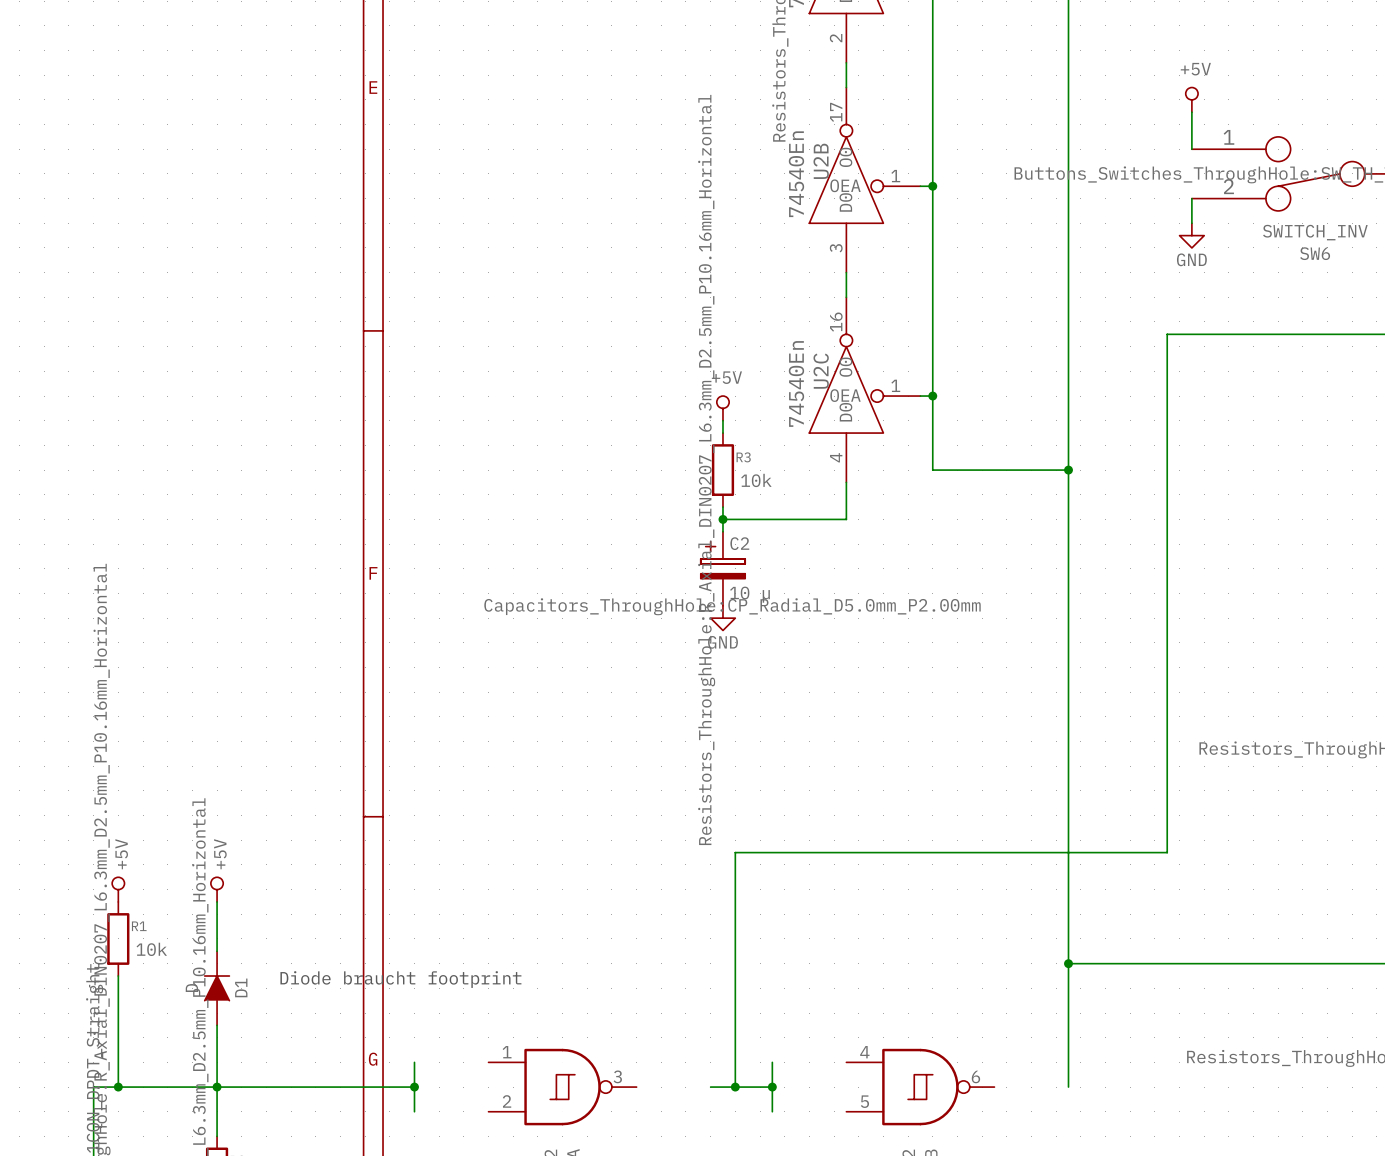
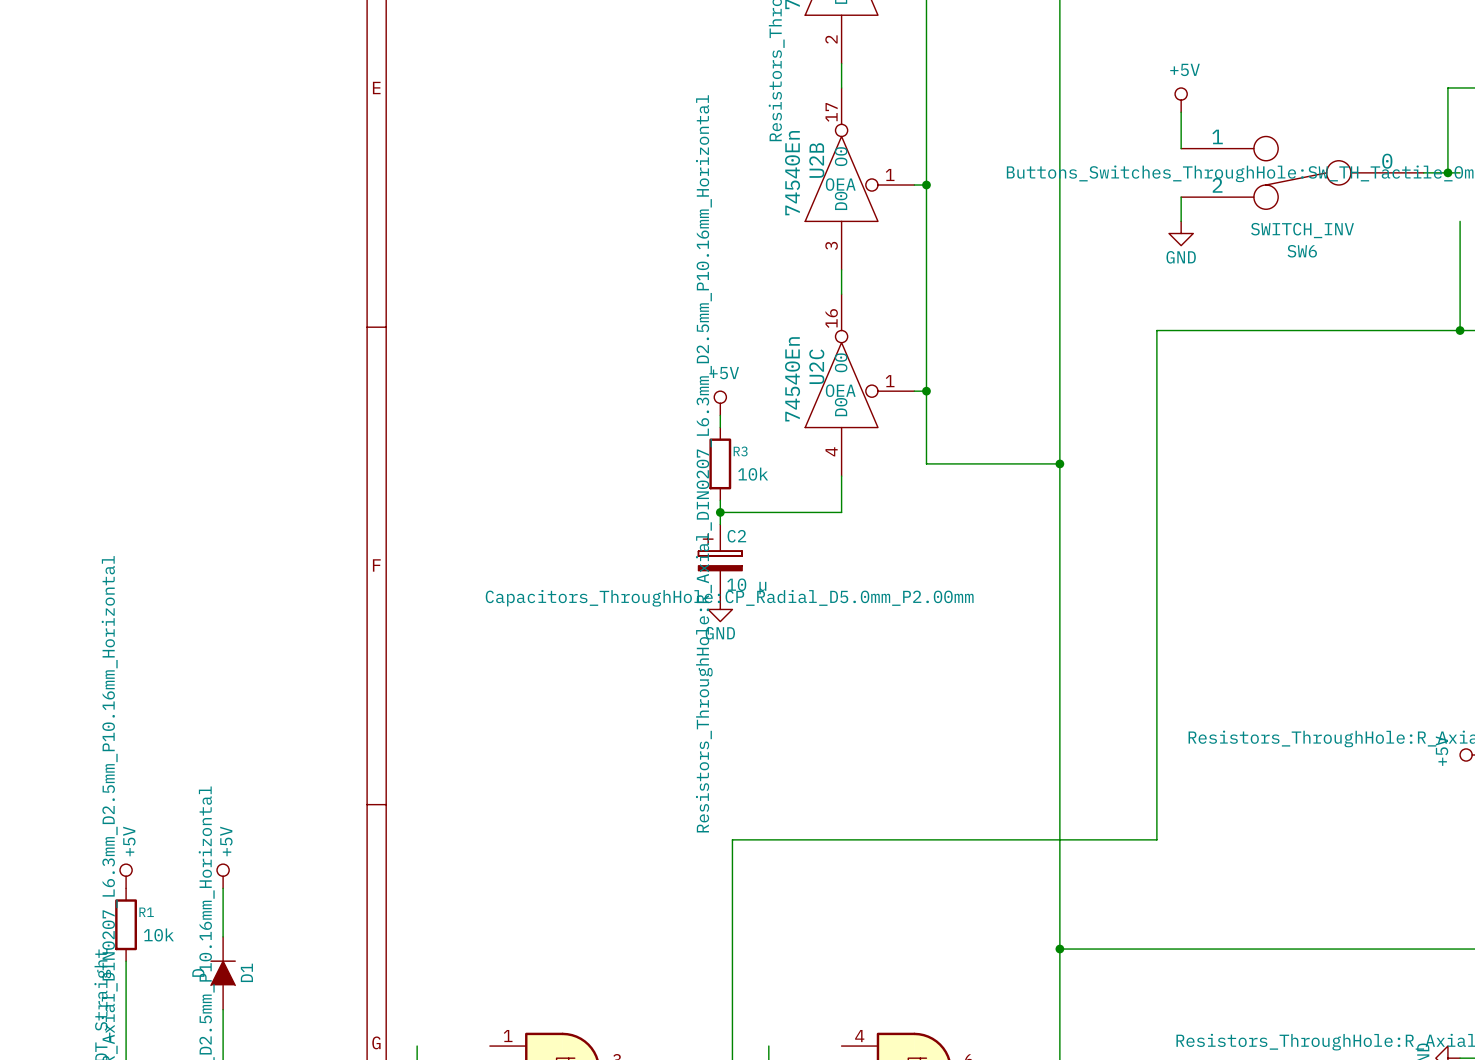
text: Diode braucht footprint (400, 979) -> none

